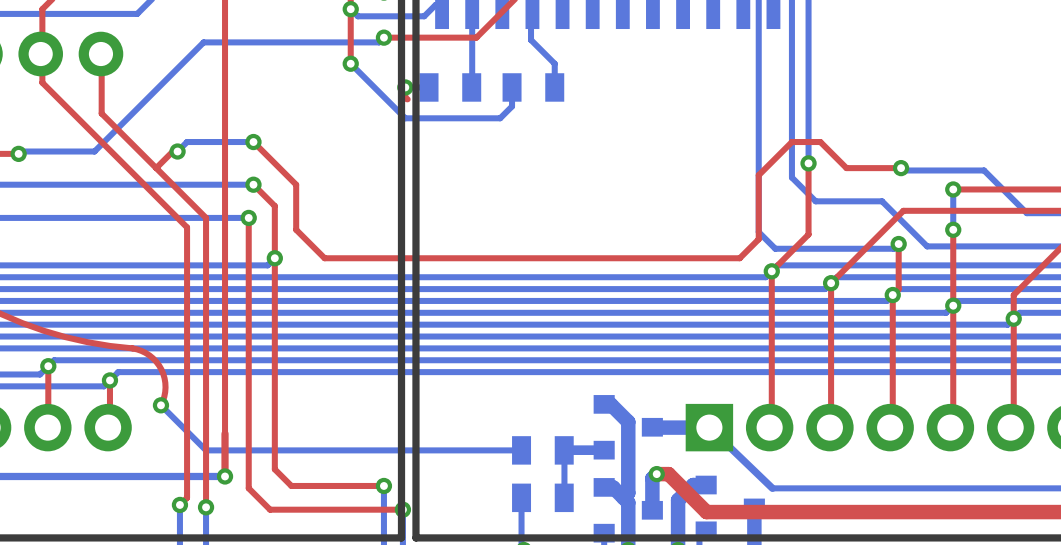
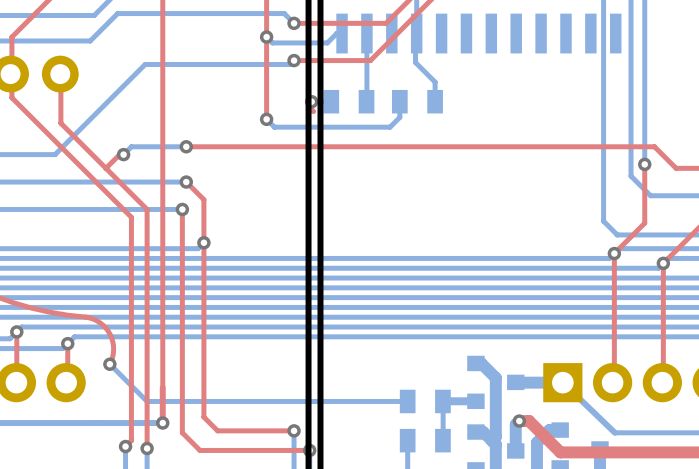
bottom track: (350, 63) (405, 118) -> (266, 119) (274, 127) (311, 127)
top track: none -> (266, 82) (266, 119)
via position: (350, 63) -> (266, 119)
top track: (253, 142) (296, 184) (296, 229) (324, 258) (739, 258) (758, 239) (758, 175) (791, 142) -> (186, 146) (631, 146)

